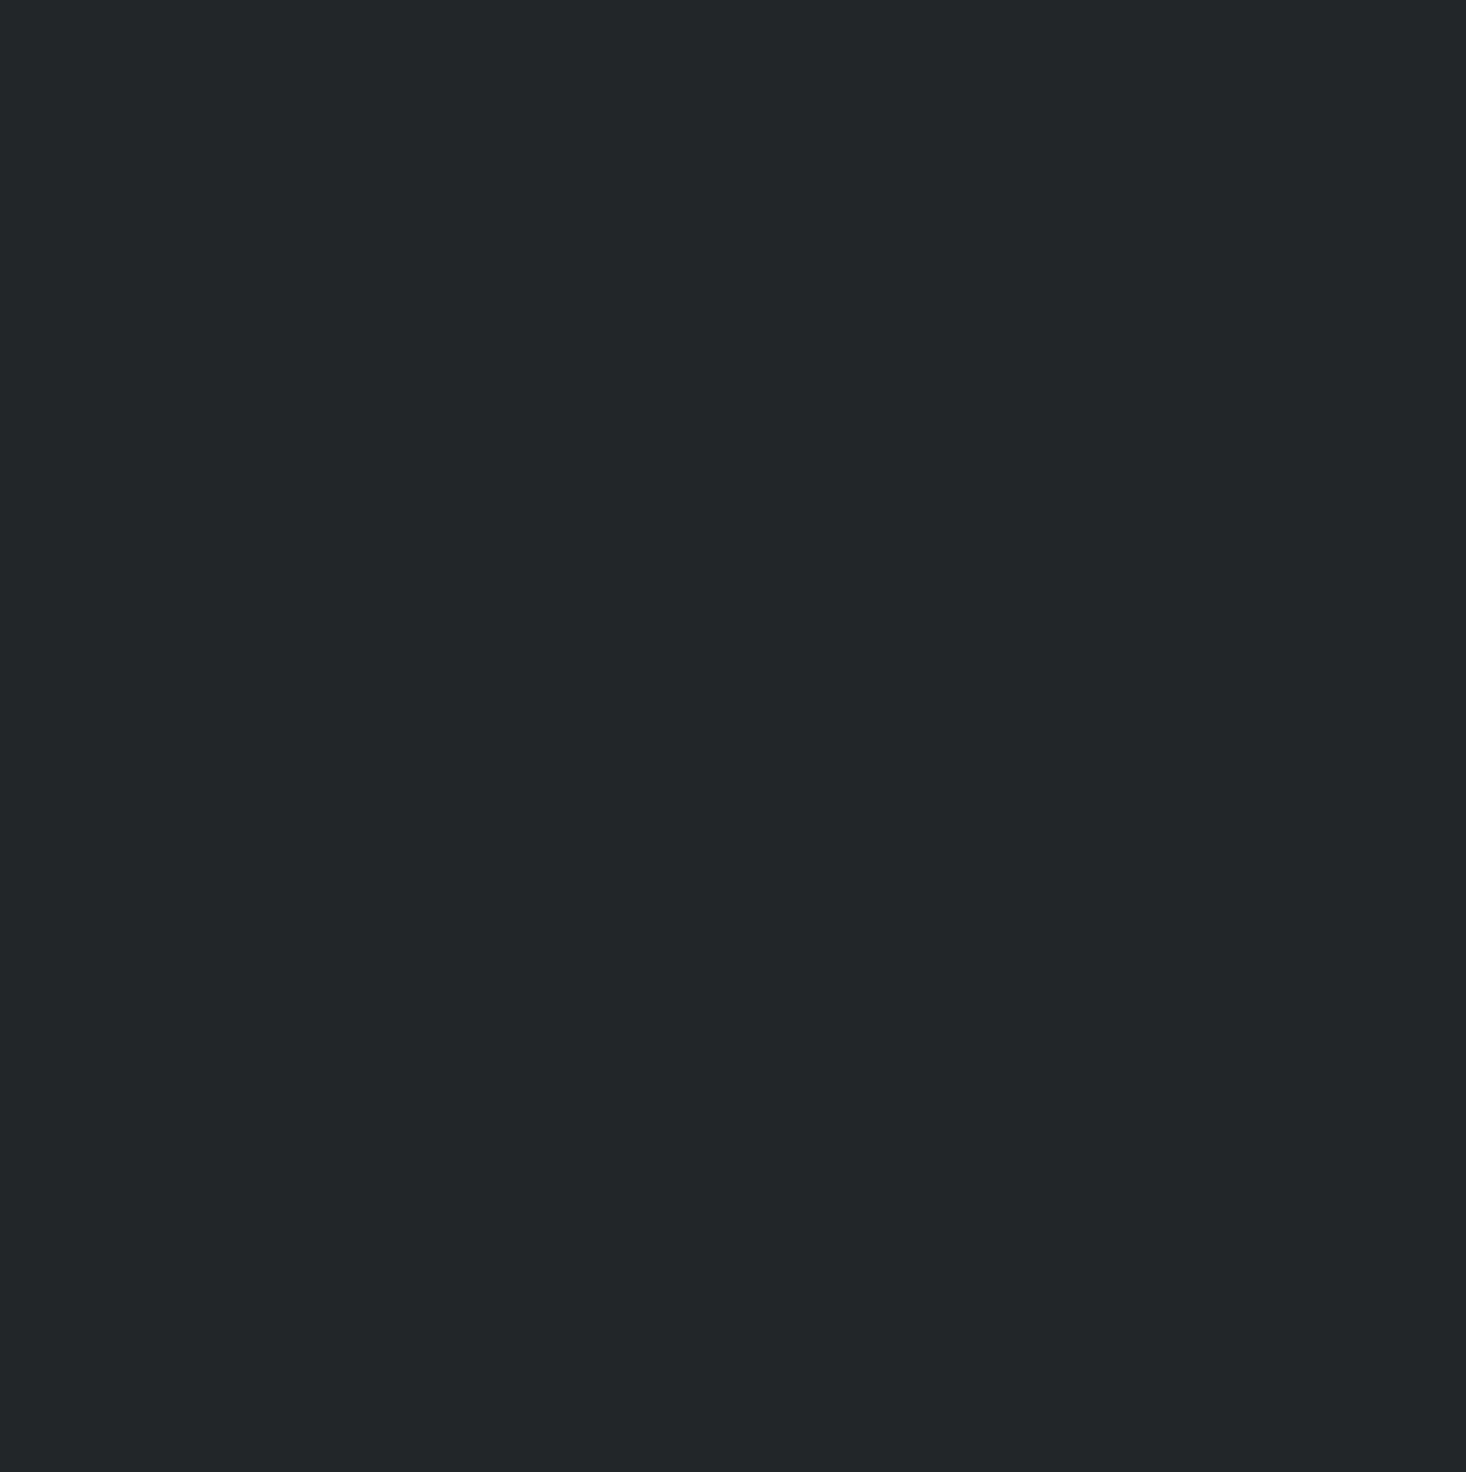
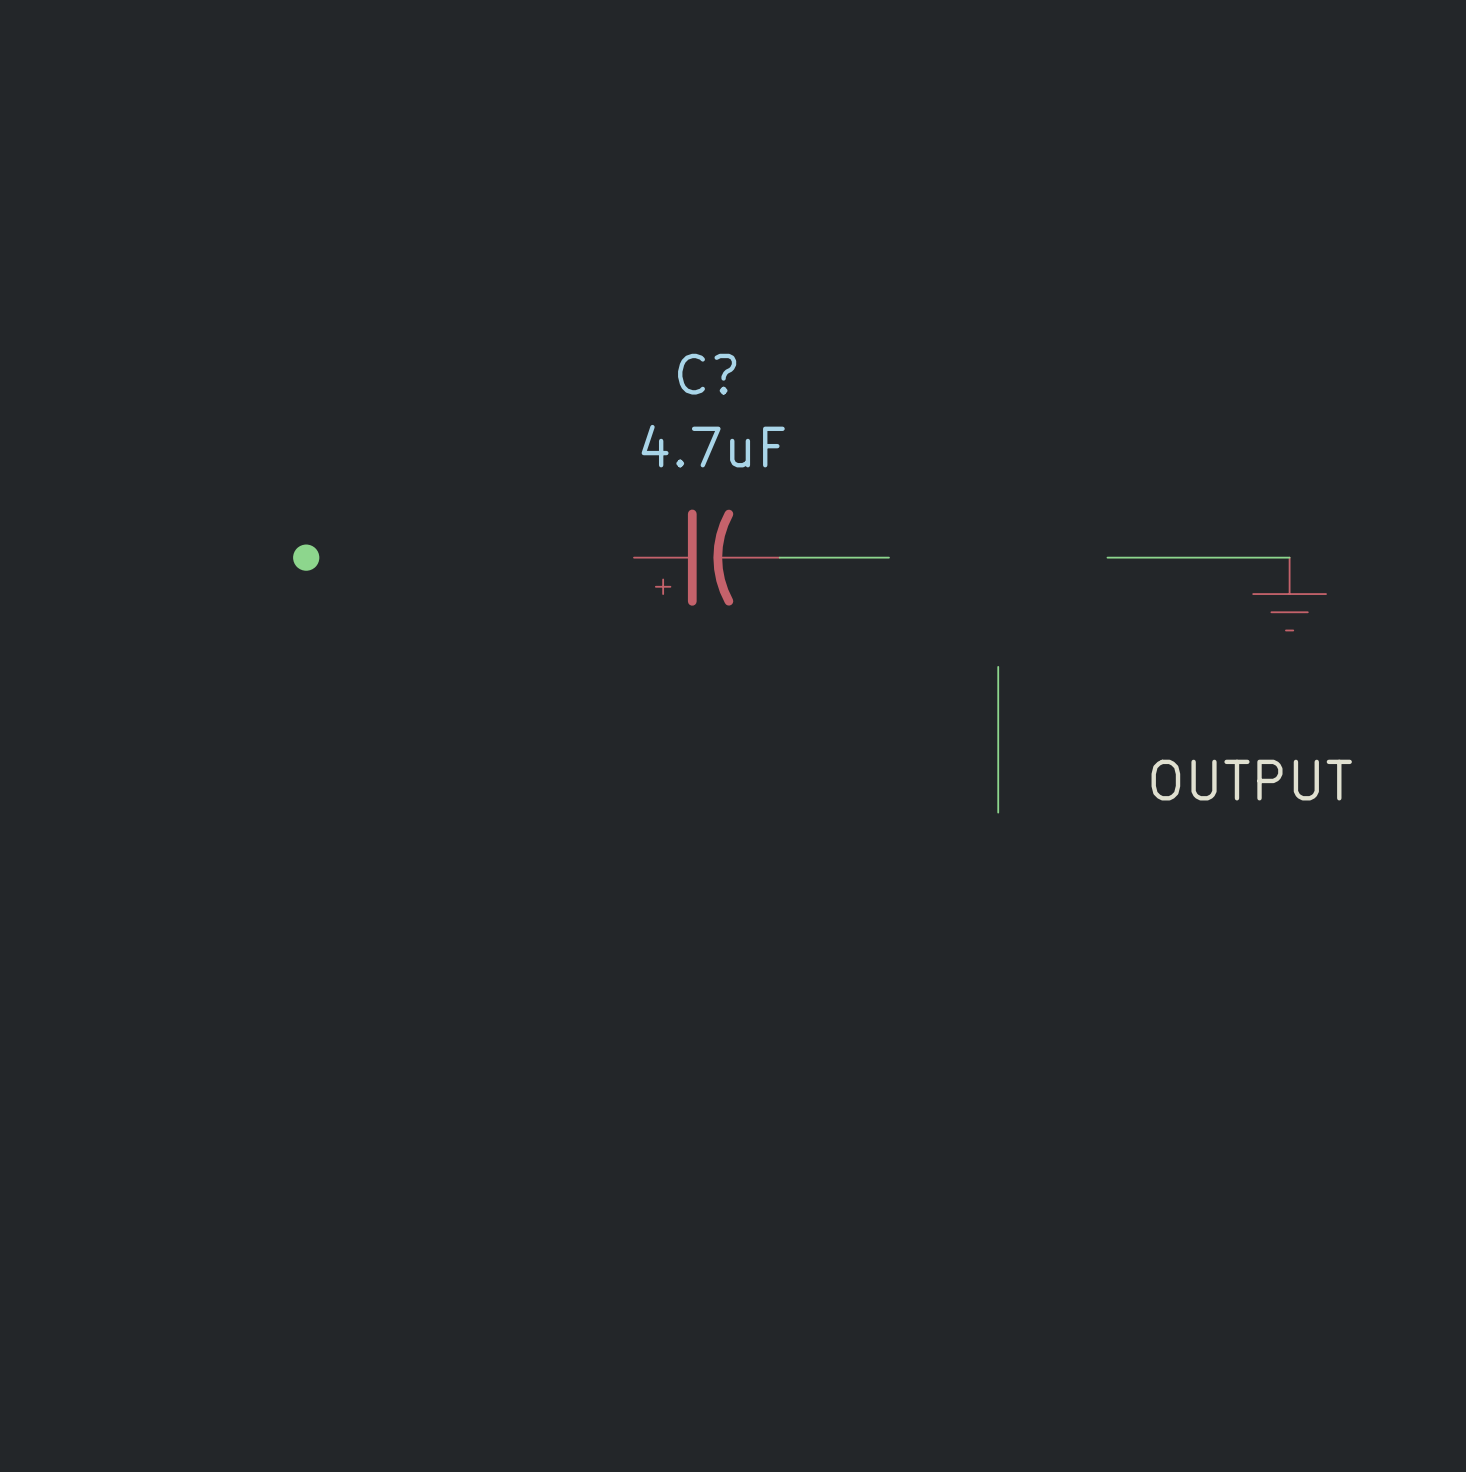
junction: none -> (306, 557)
C?: none -> 4.7uF (706, 557)
wire: none -> (779, 557) (888, 557)
wire: none -> (1107, 557) (1289, 557)
power symbol: none -> (1289, 594)
wire: none -> (998, 666) (998, 812)
label: none -> OUTPUT (1251, 780)

